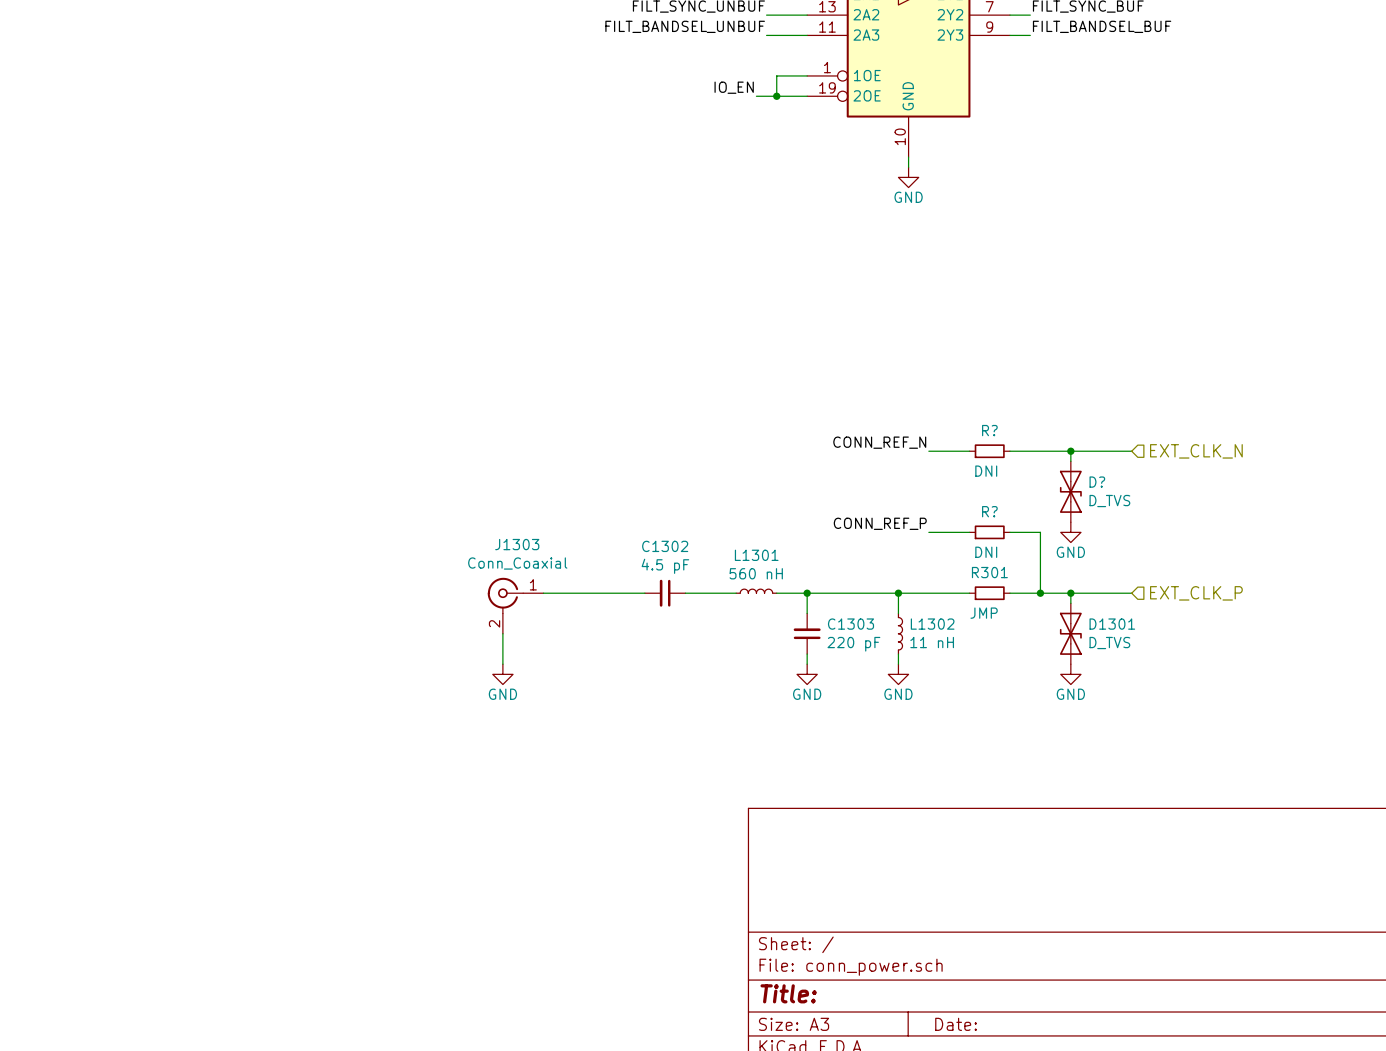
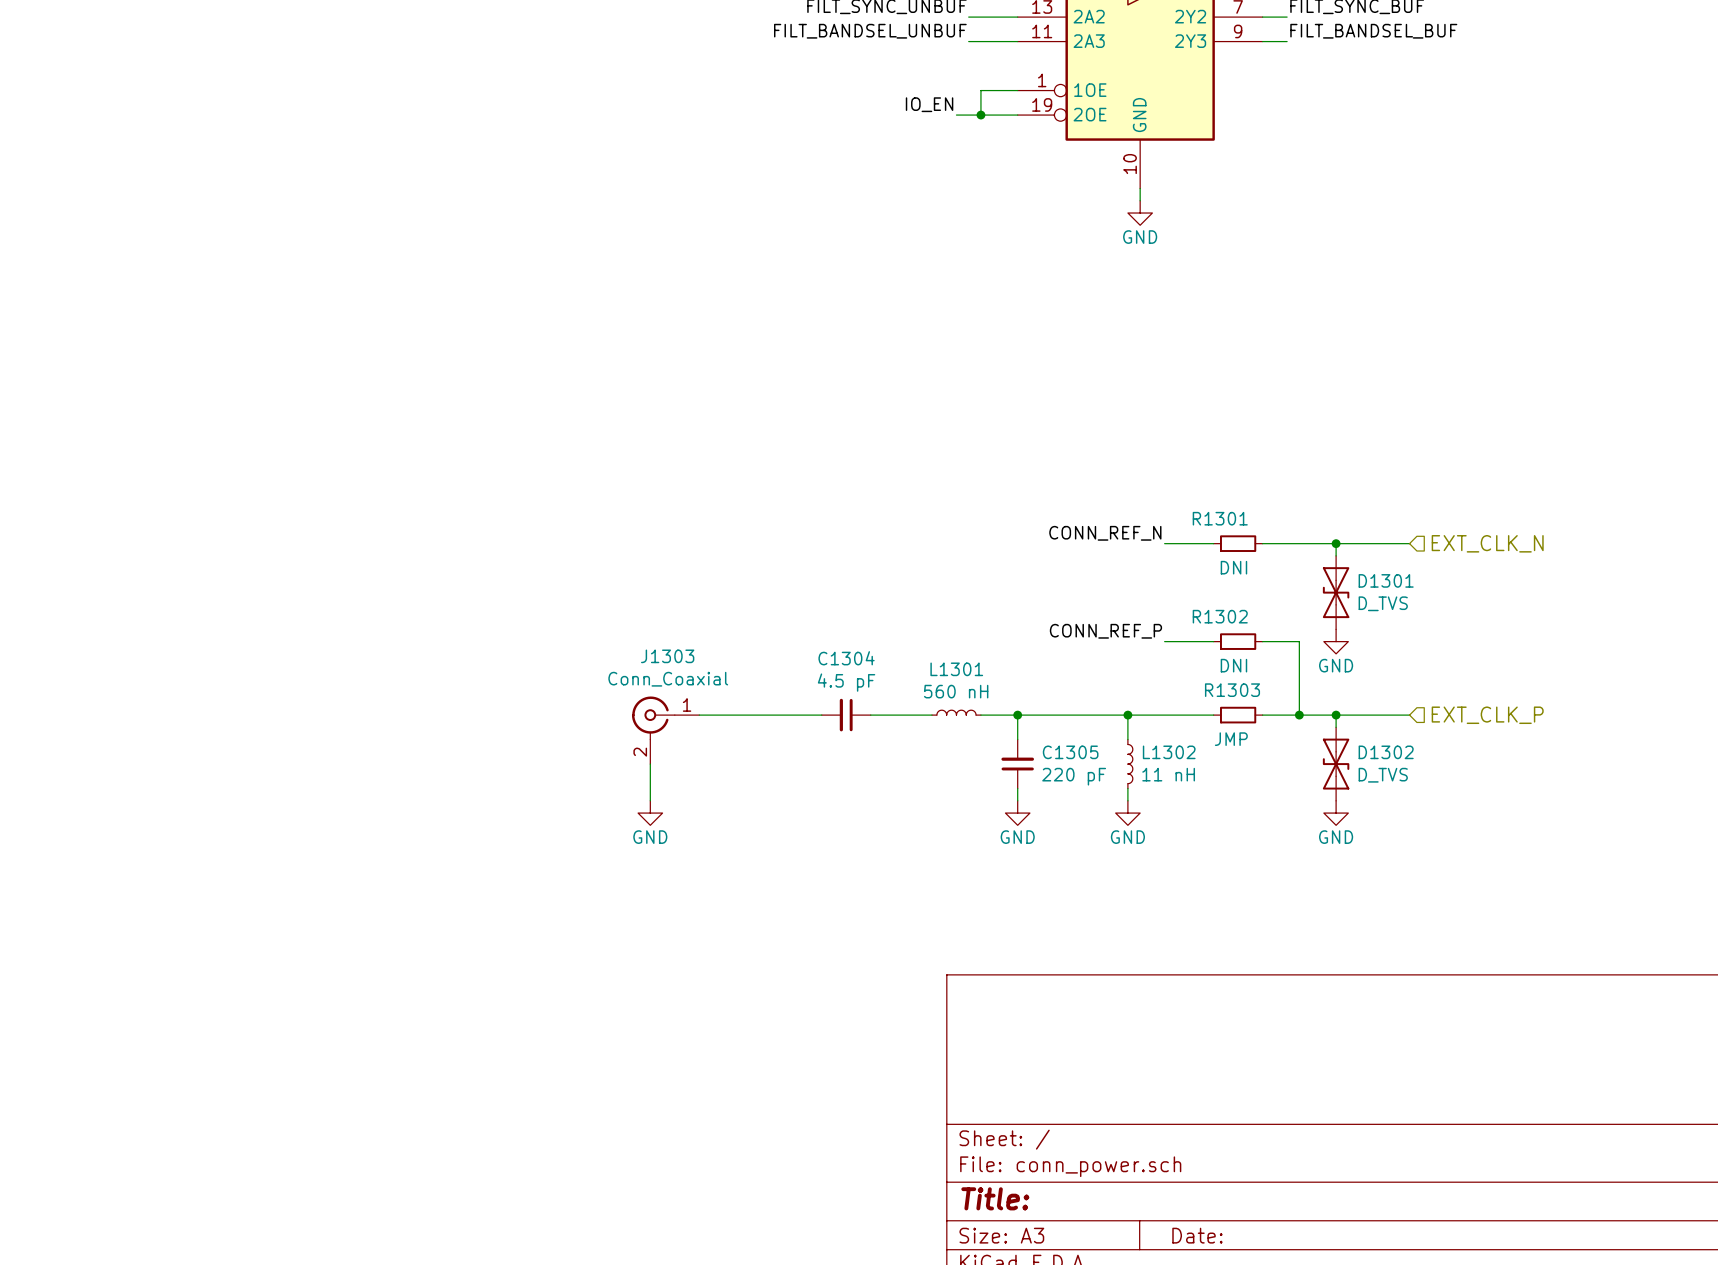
R? name: R? (989, 430) -> R1301 (1220, 518)
D? name: D? (1097, 482) -> D1301 (1386, 580)
R? name: R? (989, 511) -> R1302 (1220, 616)
C1302 name: C1302 (665, 546) -> C1304 (846, 658)
R301 name: R301 (989, 572) -> R1303 (1232, 690)
C1303 name: C1303 (851, 624) -> C1305 (1070, 752)
D1301 name: D1301 (1112, 624) -> D1302 (1386, 752)

